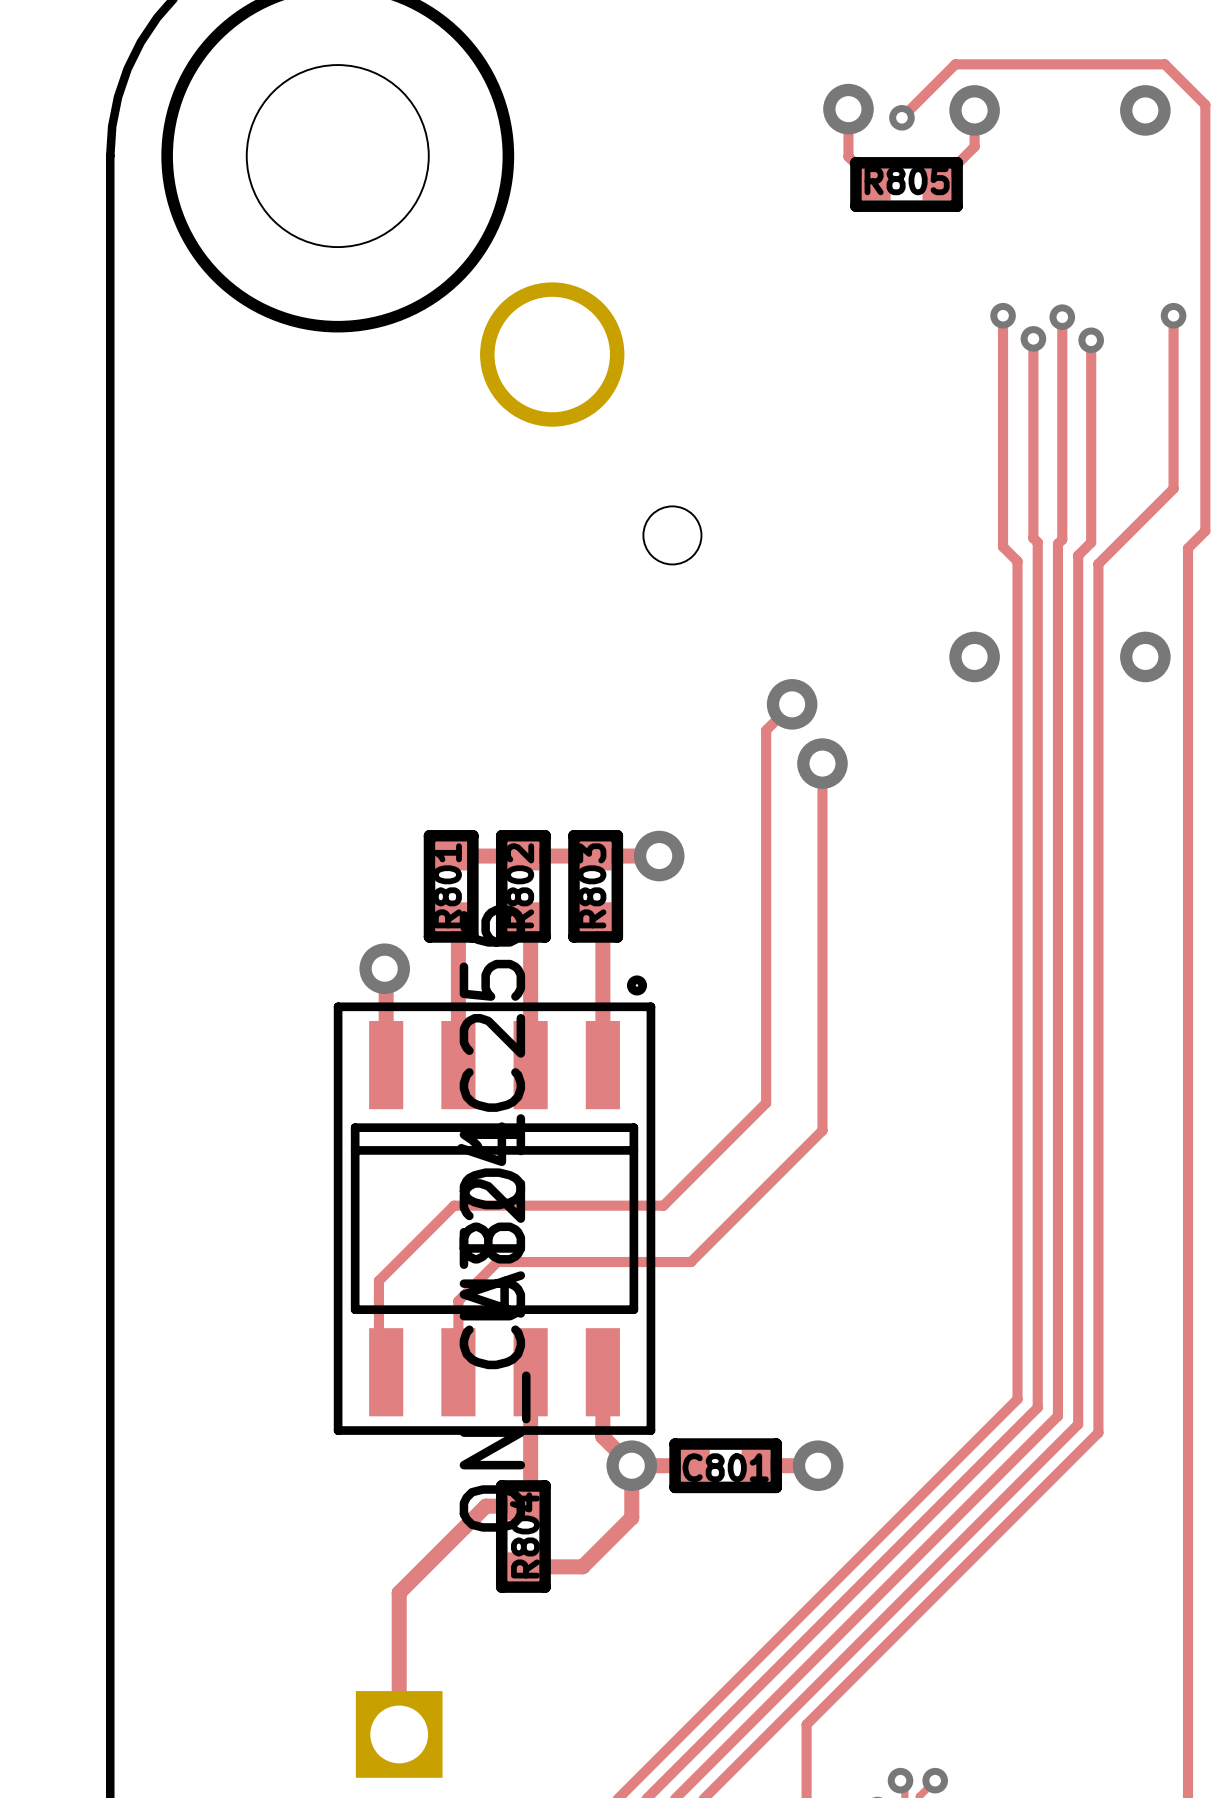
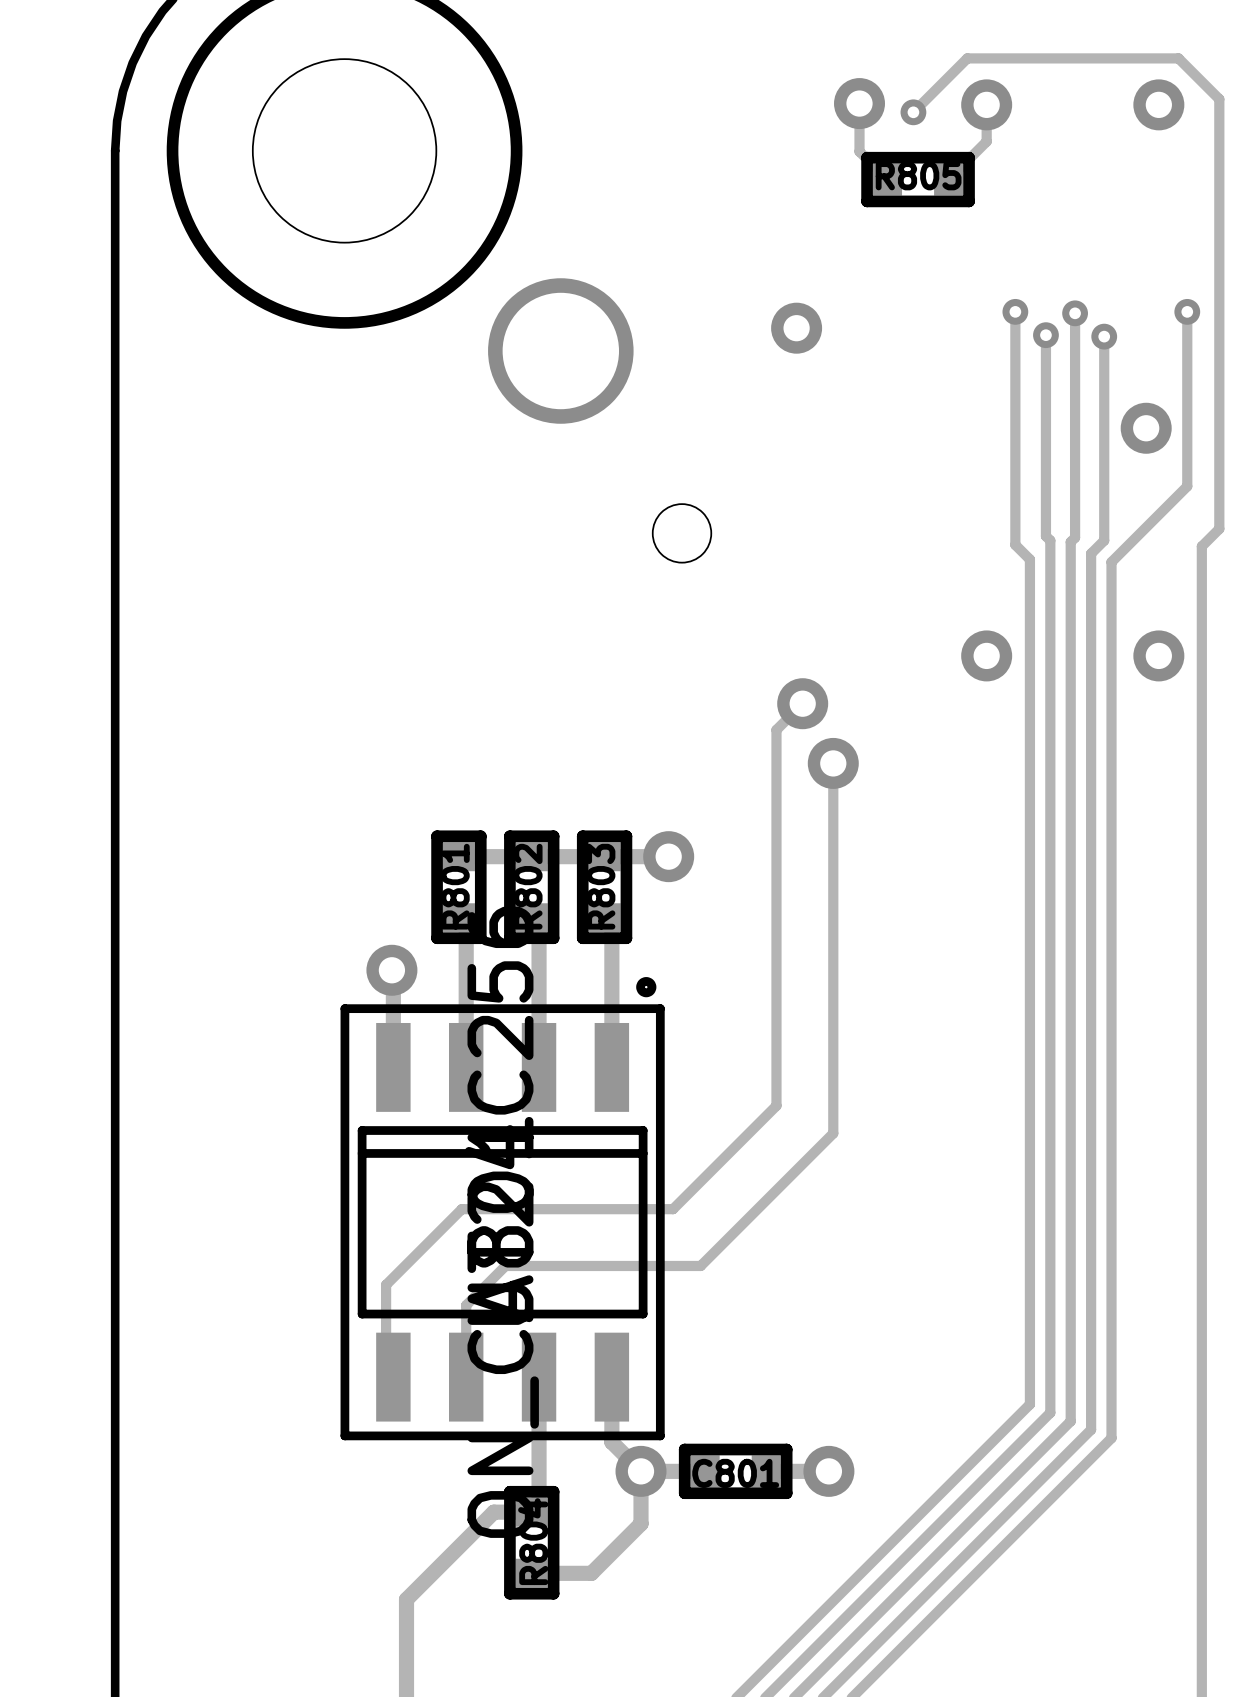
via: none -> (796, 328)
via: none -> (1146, 428)

